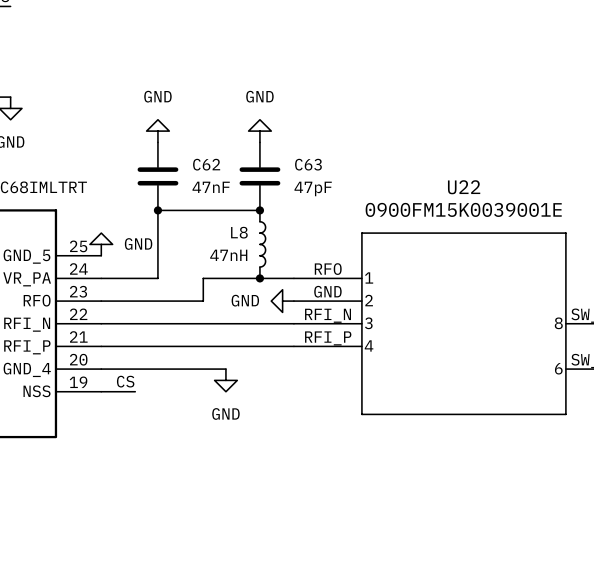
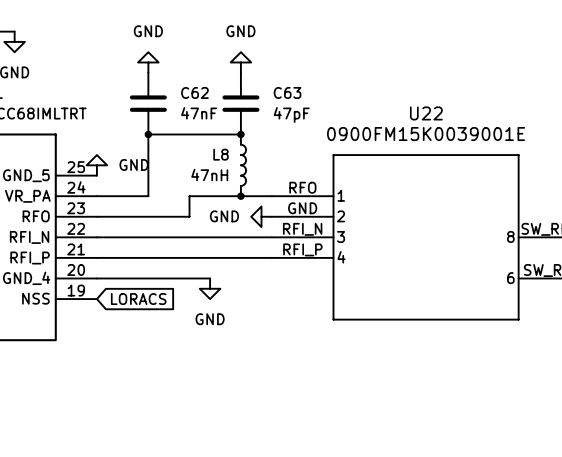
label: CS (125, 381) -> none
wire: (101, 391) (135, 391) -> none
global label: none -> LORACS (138, 299)

